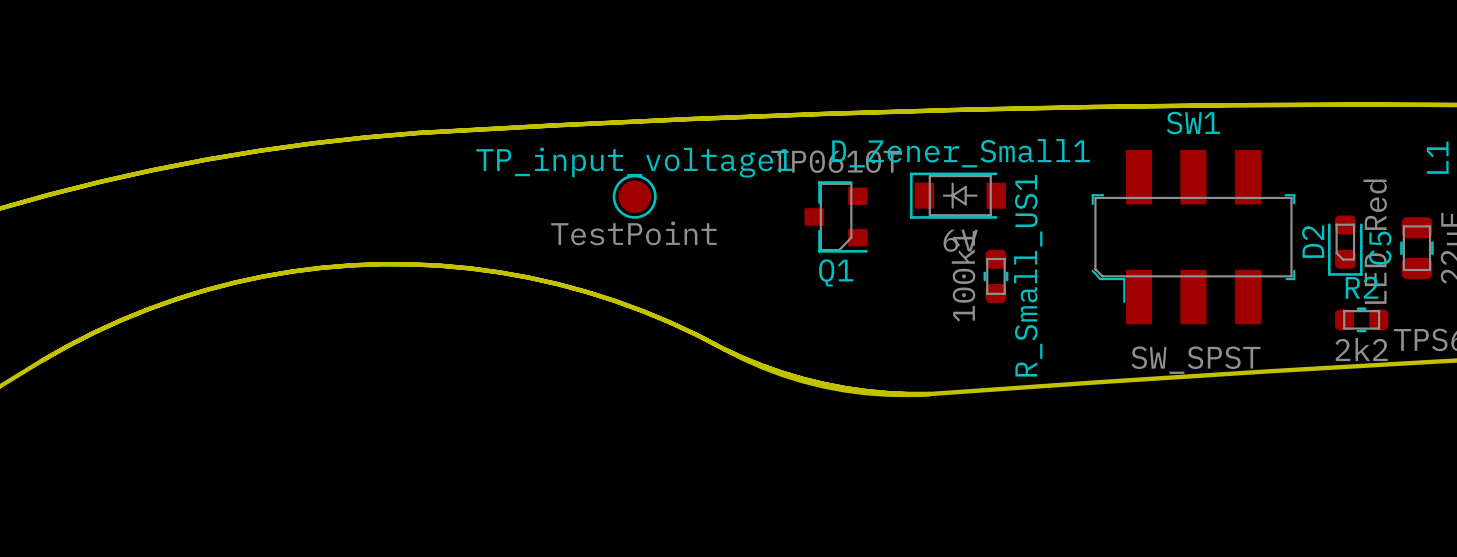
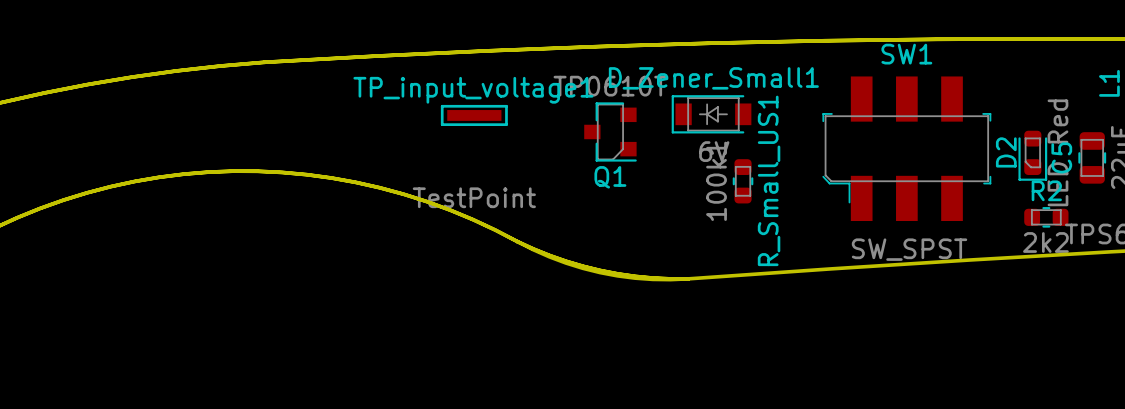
TP_input_voltage1 footprint: [612, 174, 657, 219] -> [440, 104, 508, 126]
TP_input_voltage1 value position: TestPoint (633, 233) -> TestPoint (474, 197)

